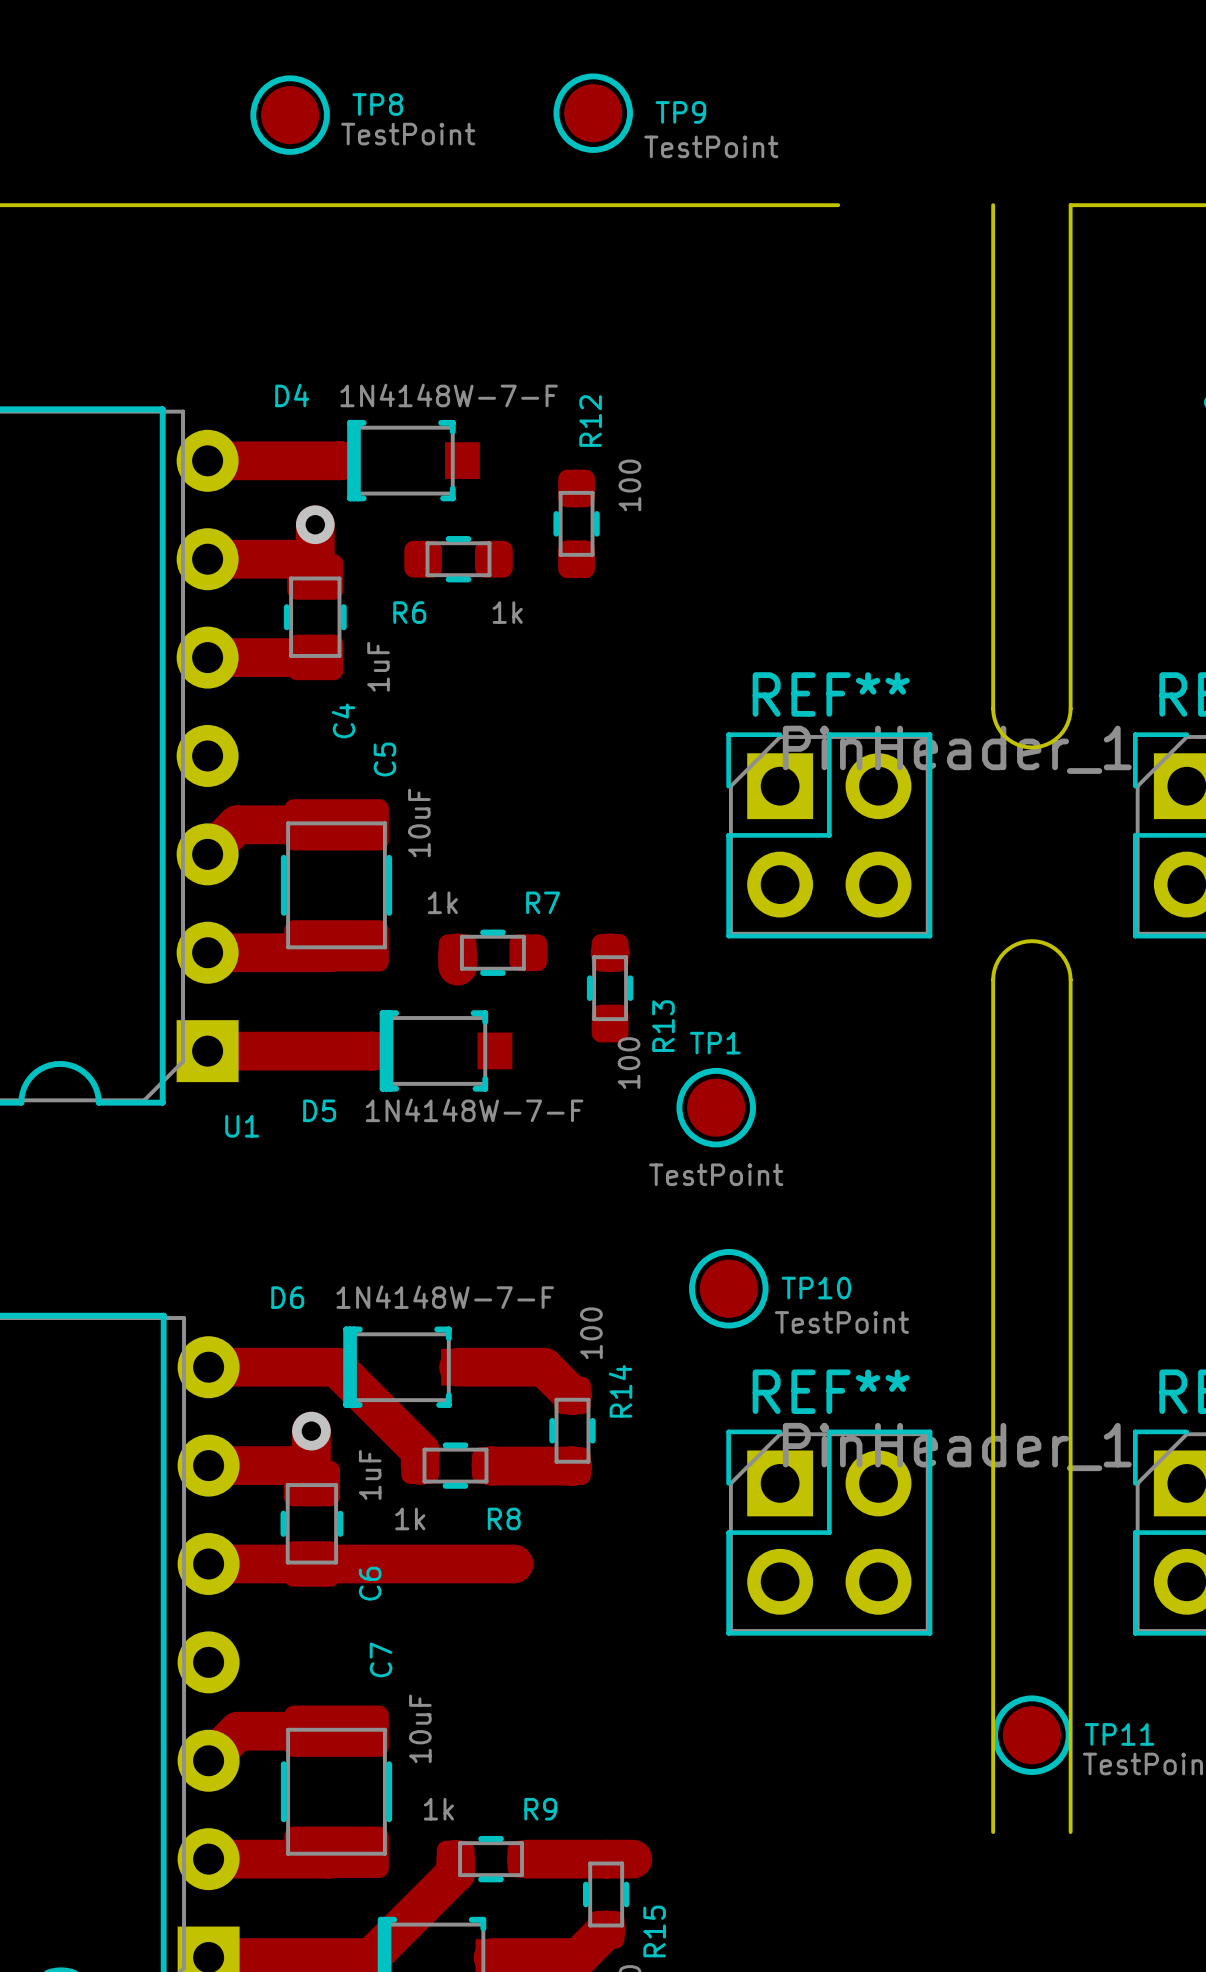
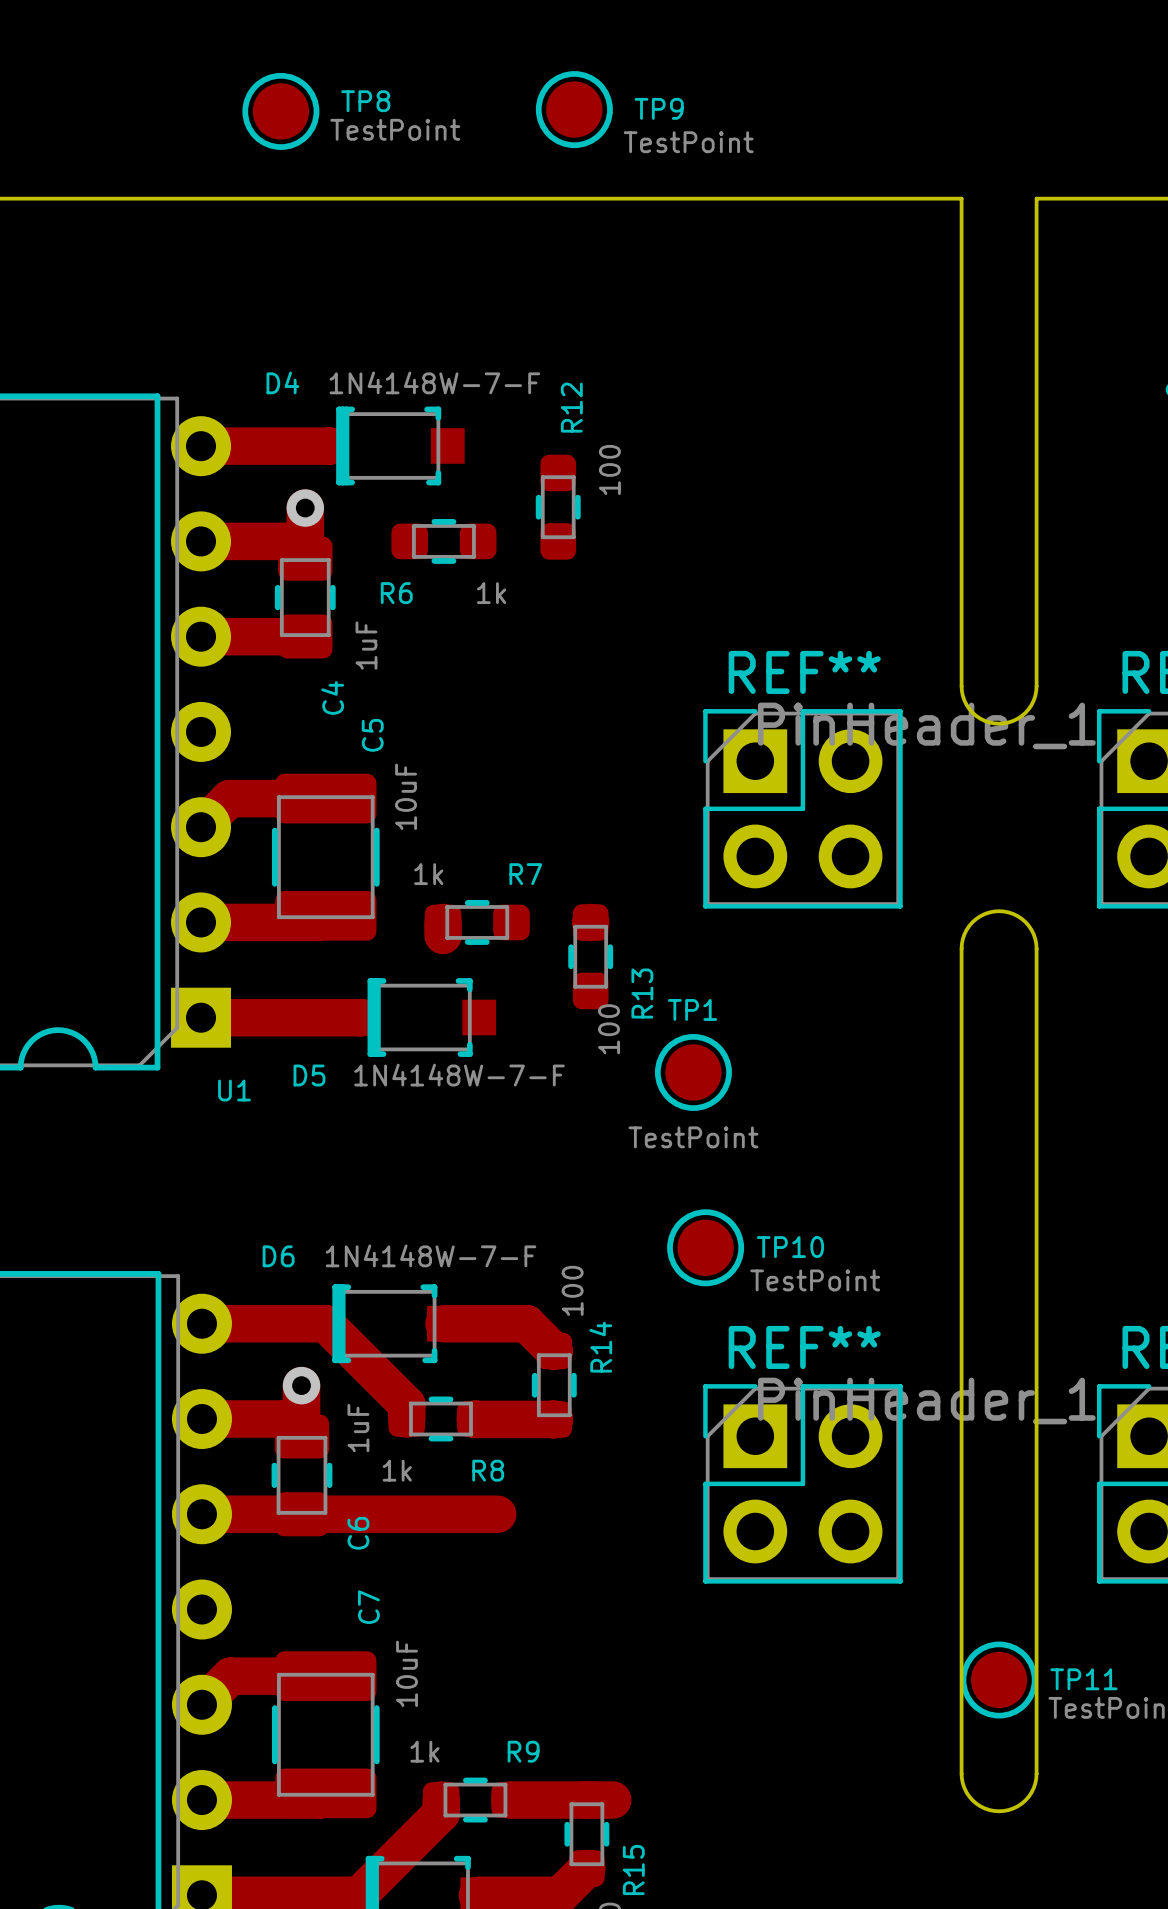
board edge: none -> (811, 198) (961, 198)
board edge: none -> (961, 1773) (964, 1788) (972, 1800) (984, 1808) (999, 1811) (1013, 1808) (1025, 1800) (1033, 1788) (1036, 1773)

